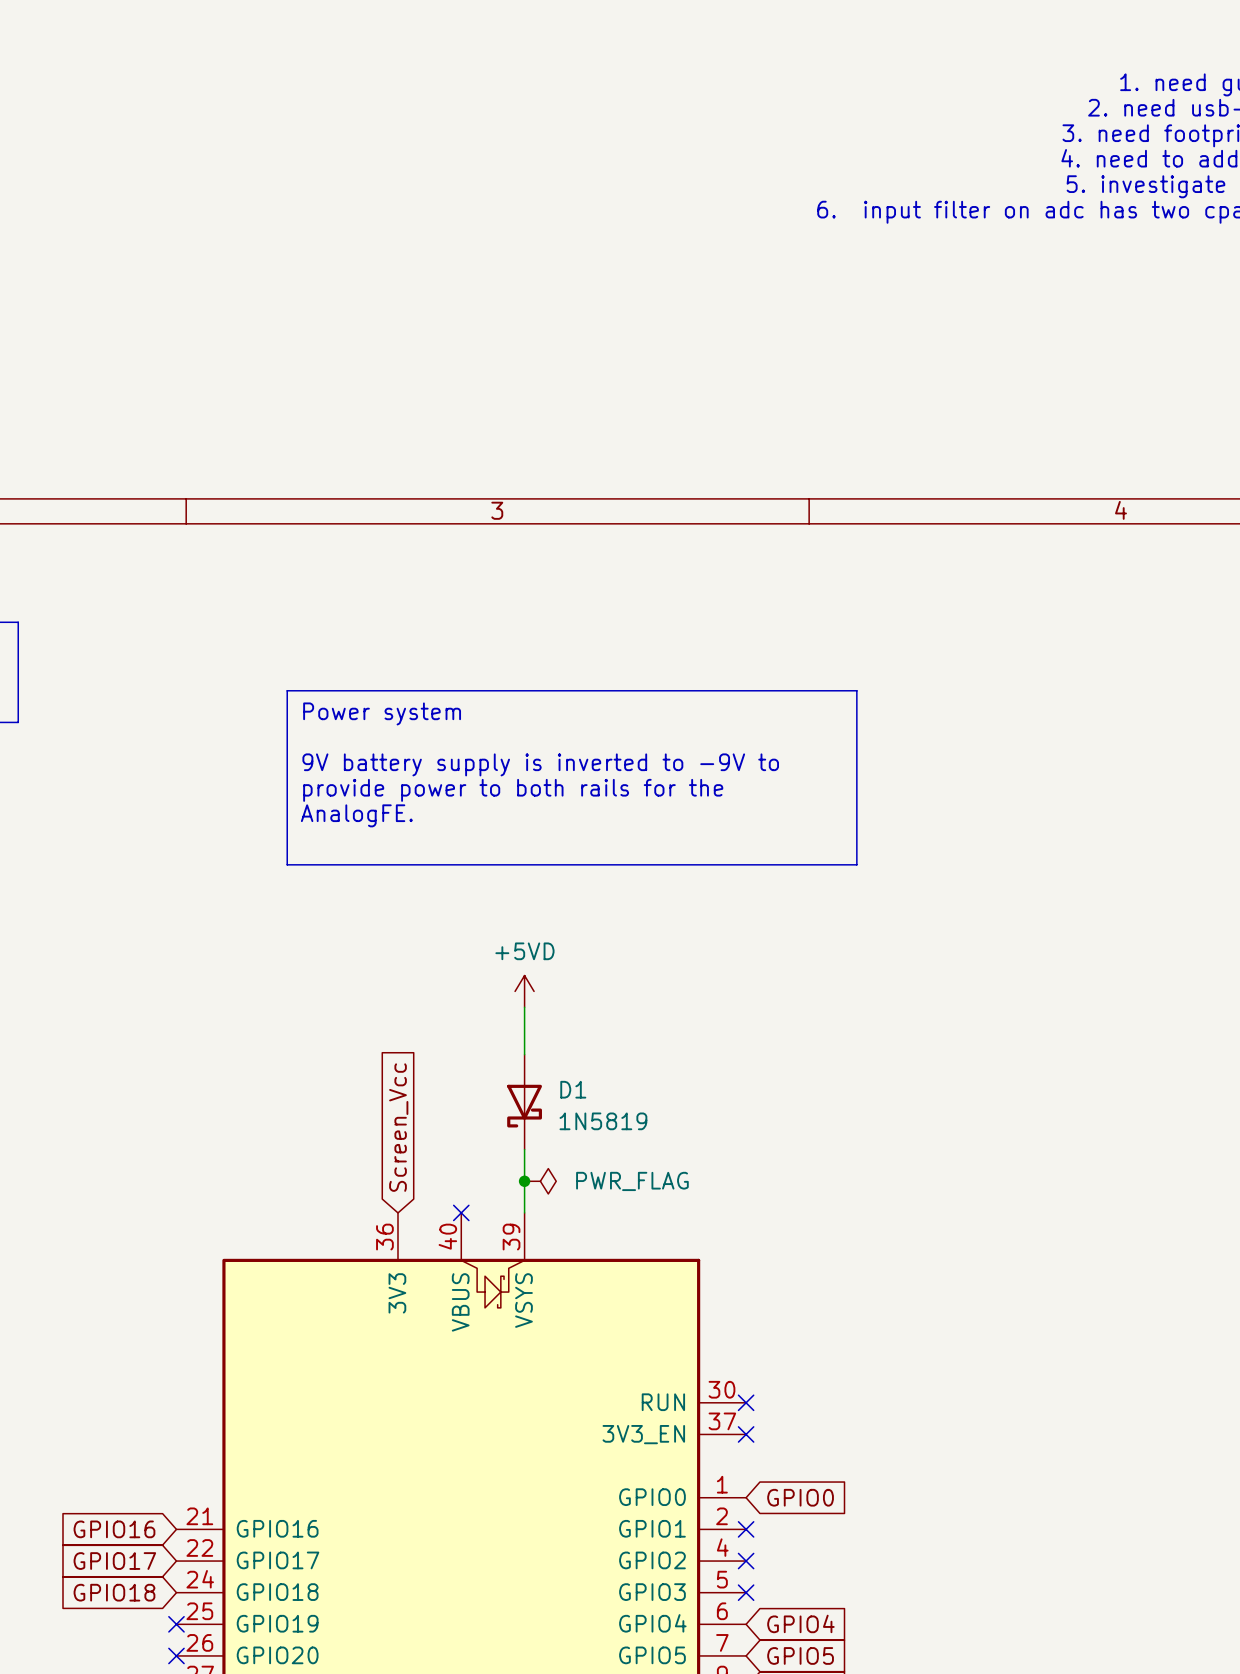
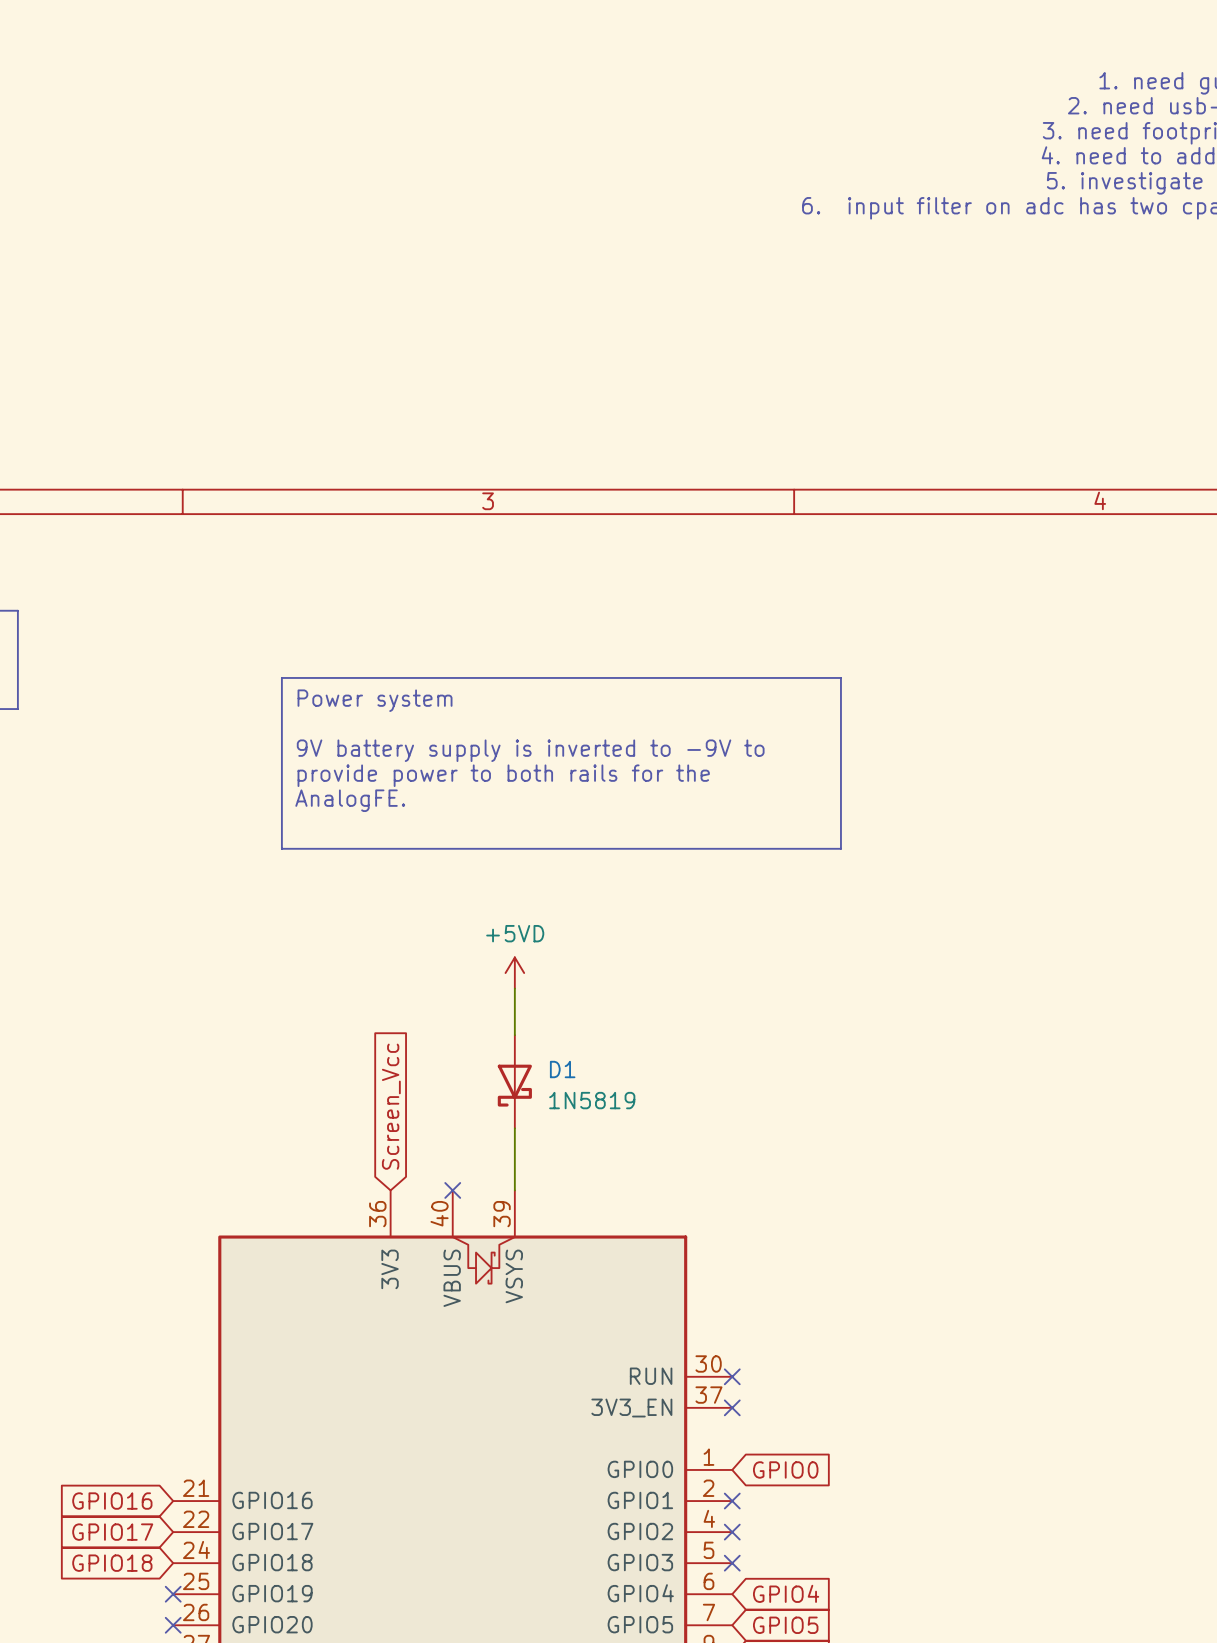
junction: (524, 1181) -> none
power symbol: PWR_FLAG (540, 1181) -> none

